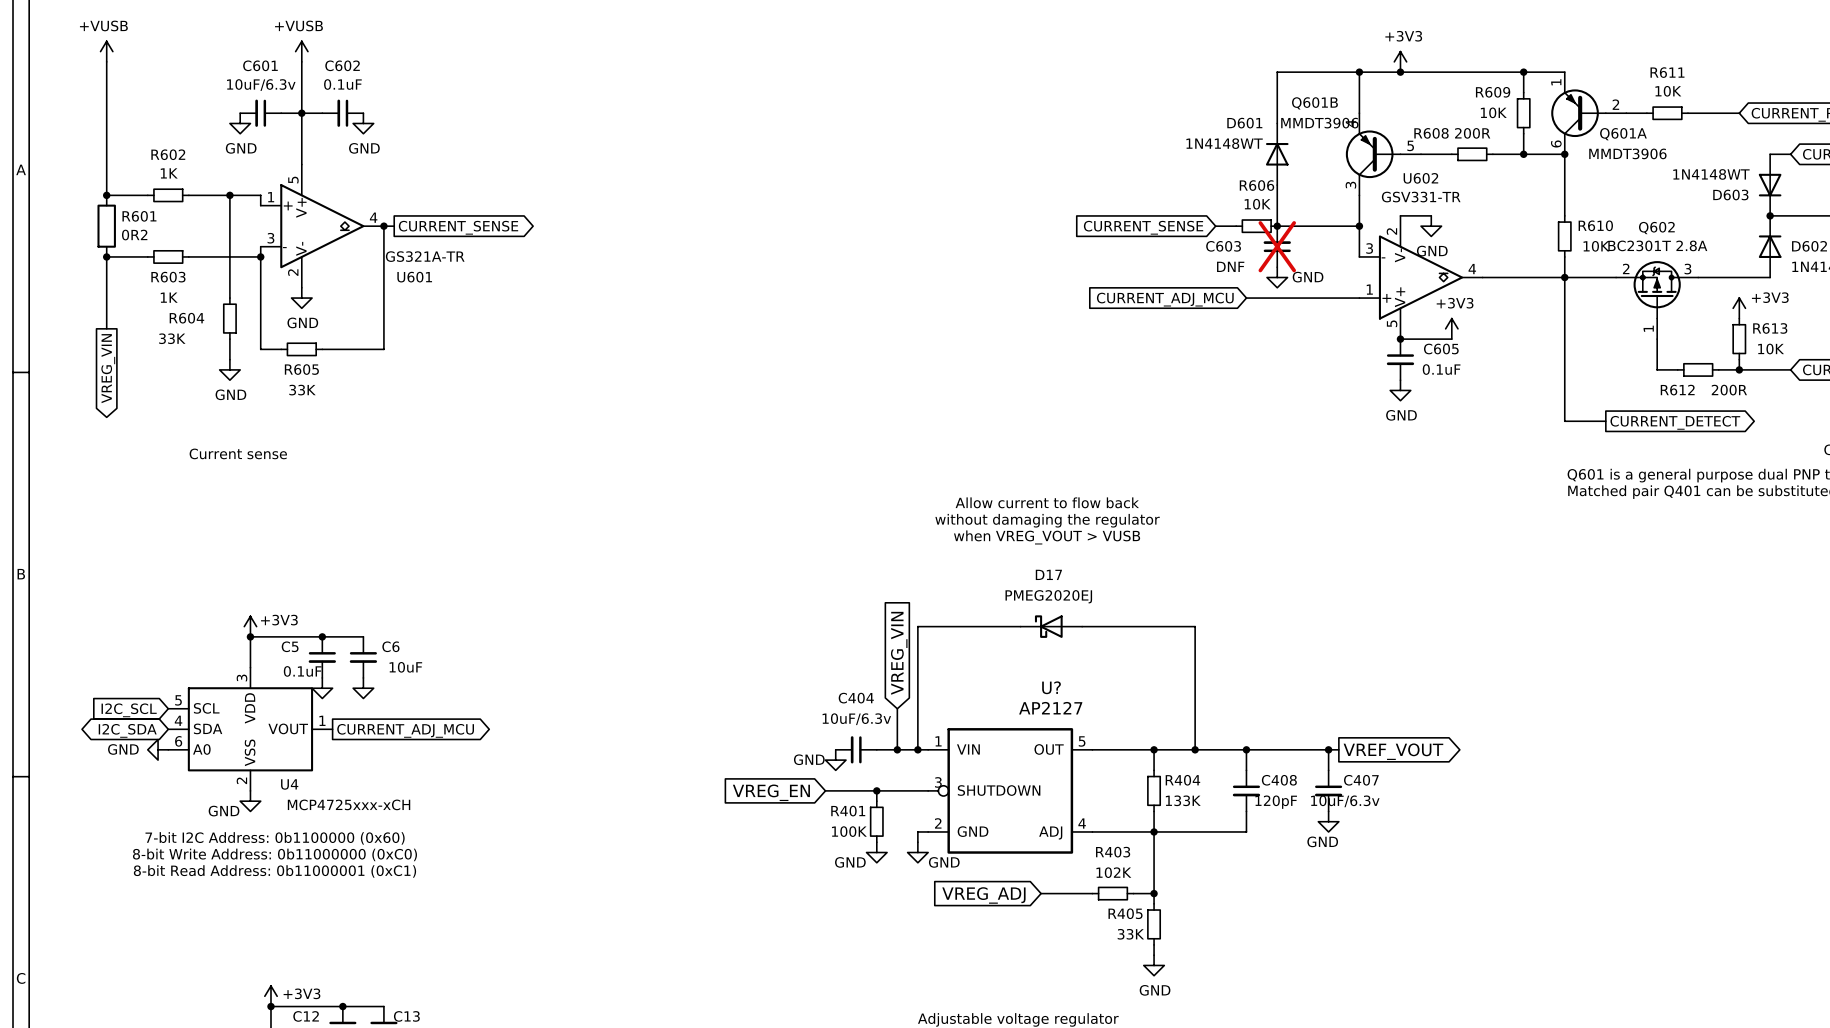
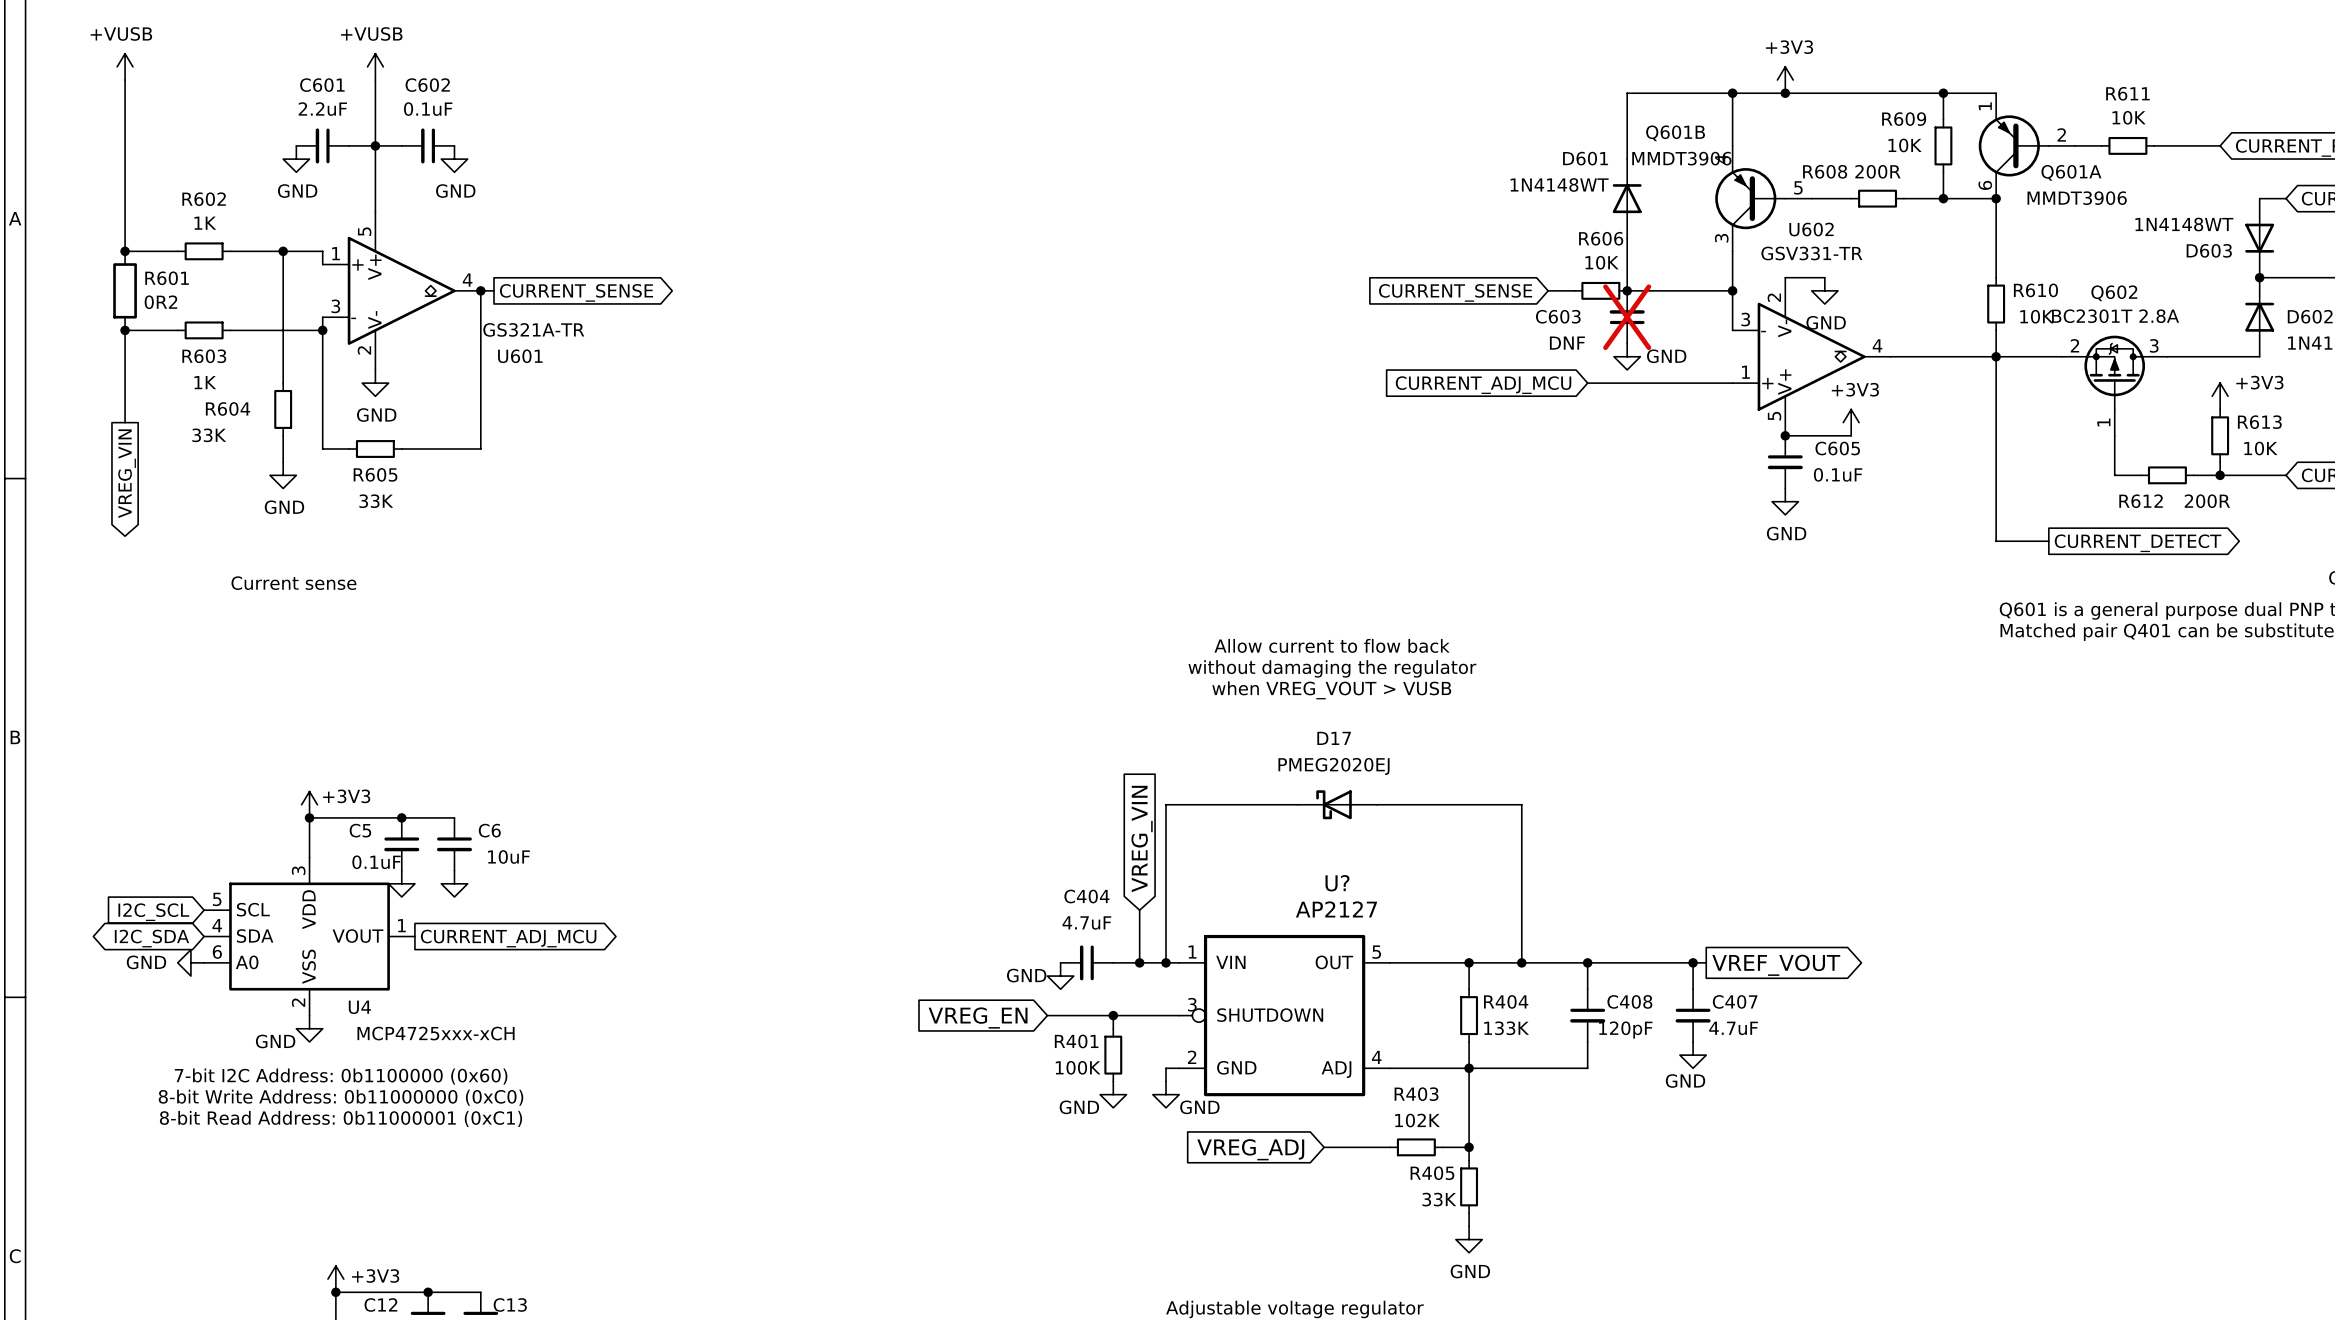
C601 value: 10uF/6.3v (261, 85) -> 2.2uF (322, 109)
C404 value: 10uF/6.3v (856, 719) -> 4.7uF (1086, 922)
C407 value: 10uF/6.3v (1345, 801) -> 4.7uF (1733, 1028)

